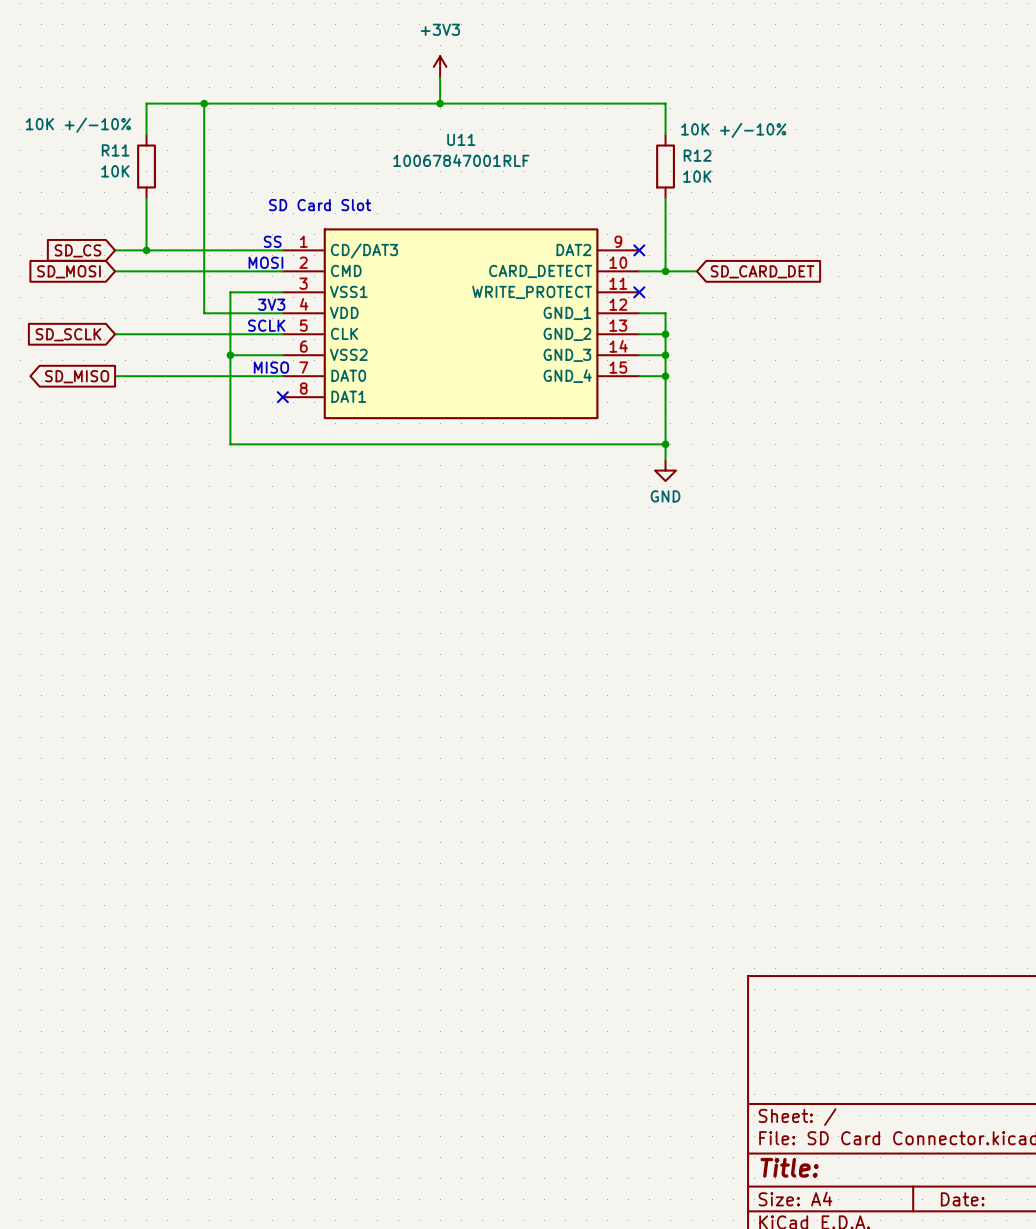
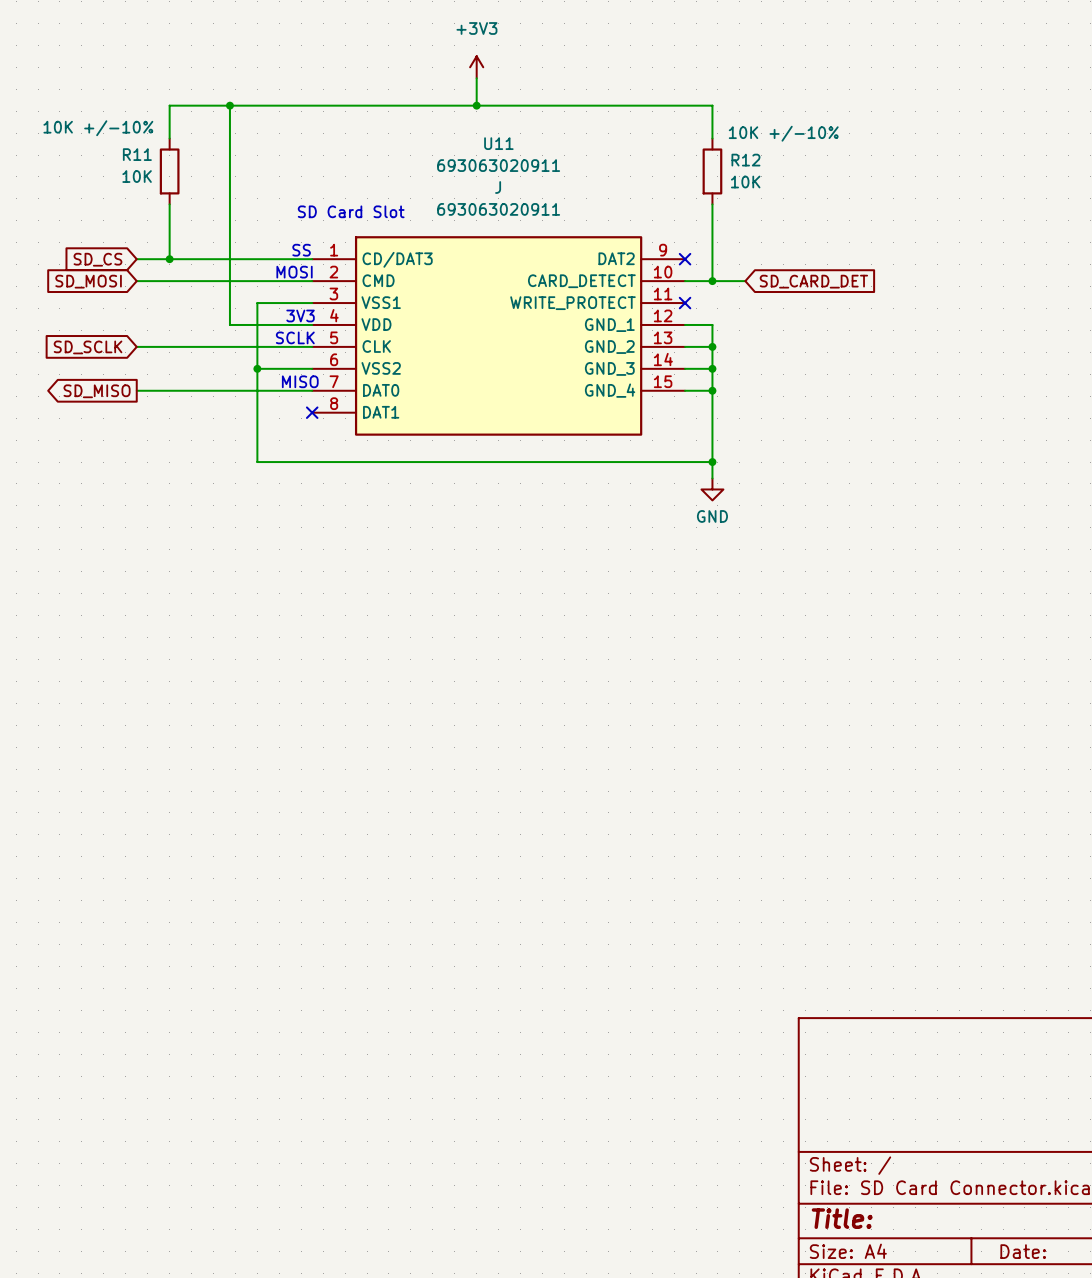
U11 value: 10067847001RLF (461, 160) -> 693063020911 (498, 165)
U11 text: none -> J (498, 187)
U11 text: none -> 693063020911 (498, 209)

